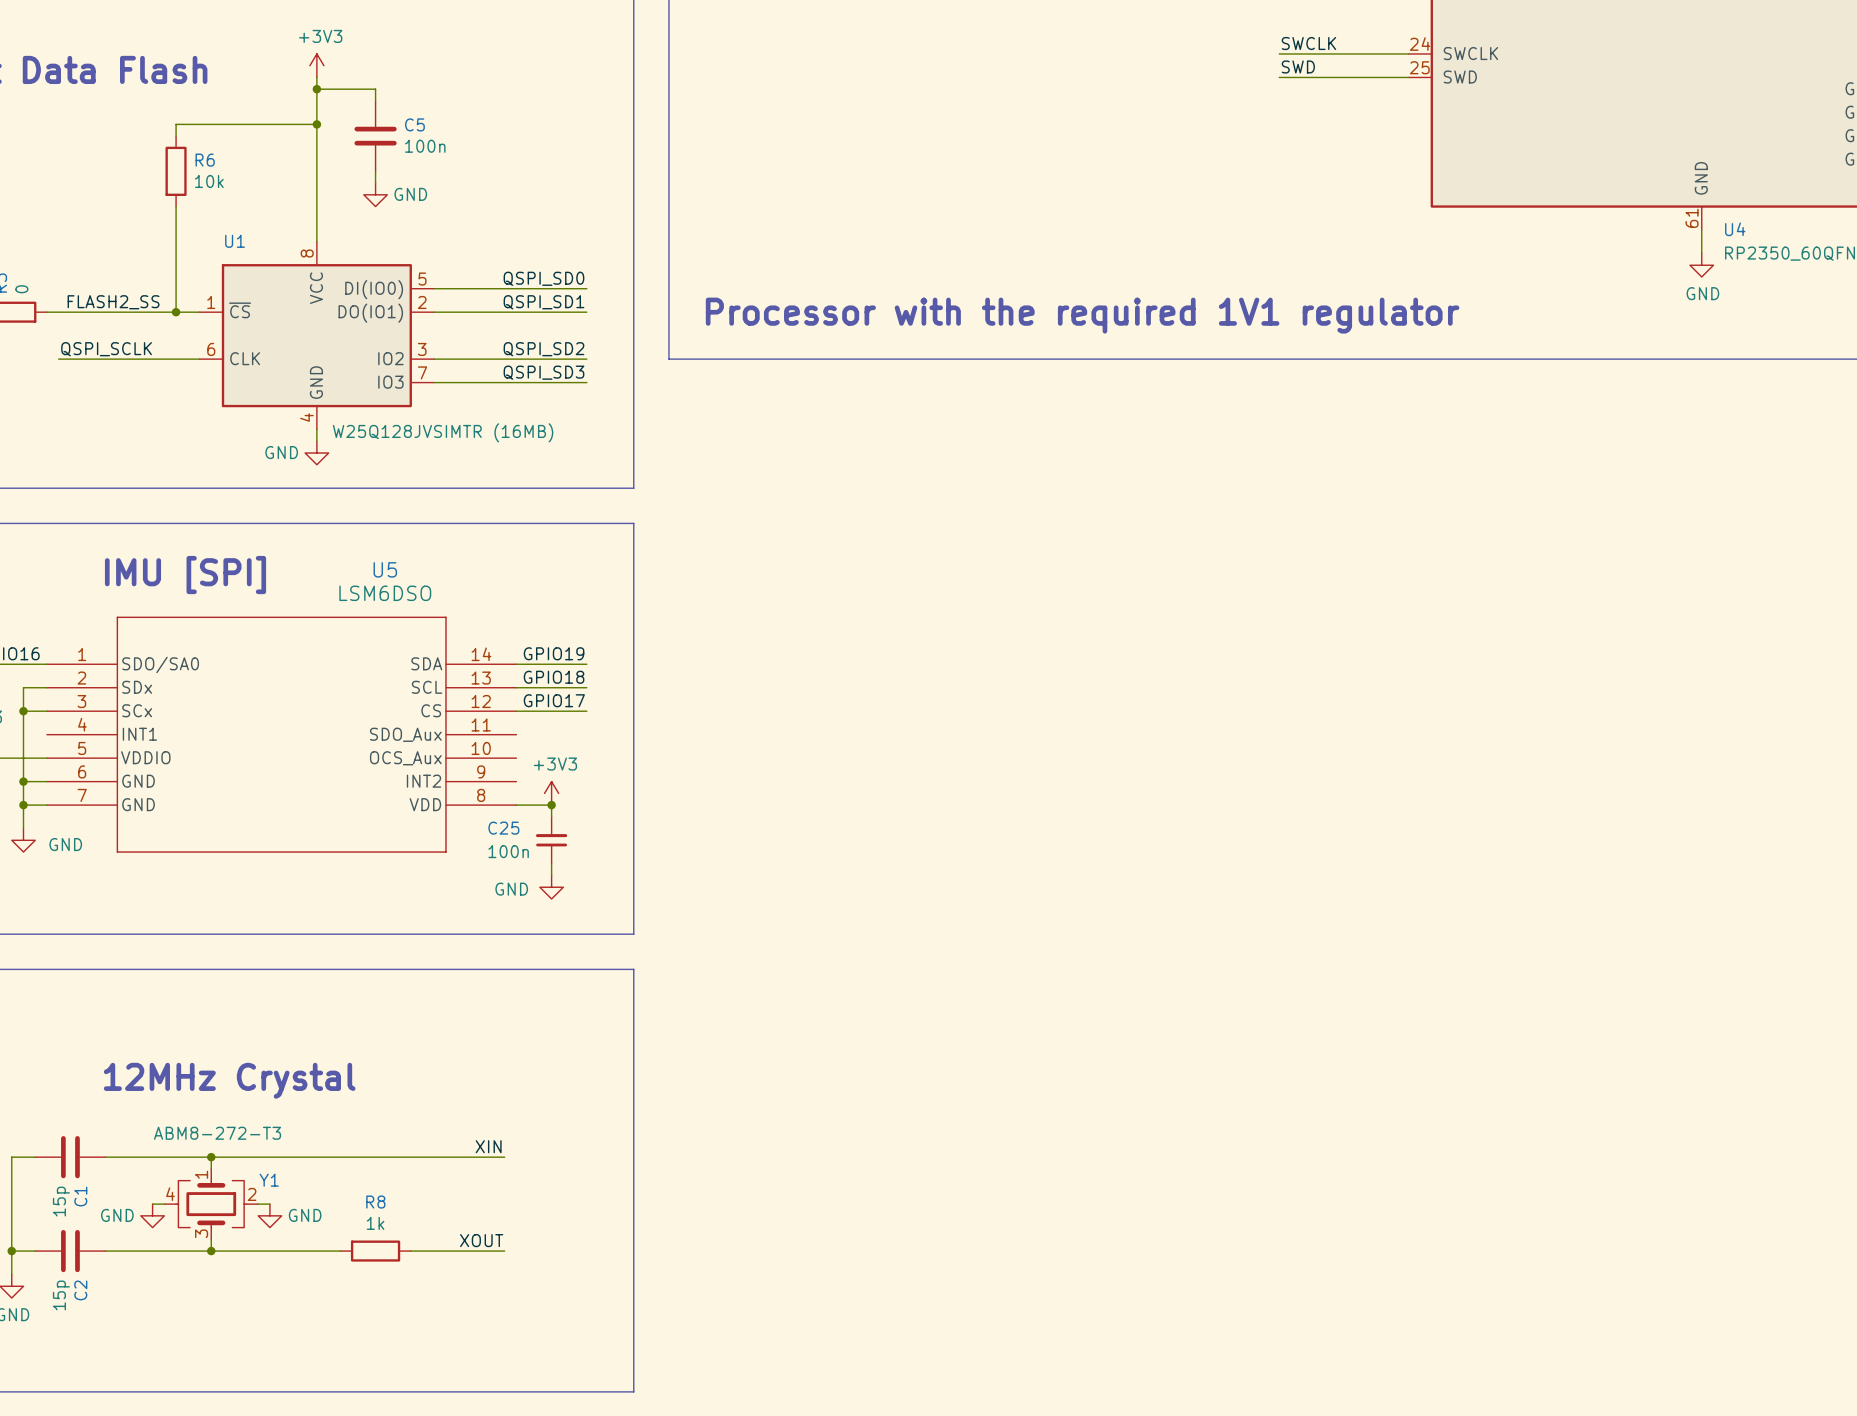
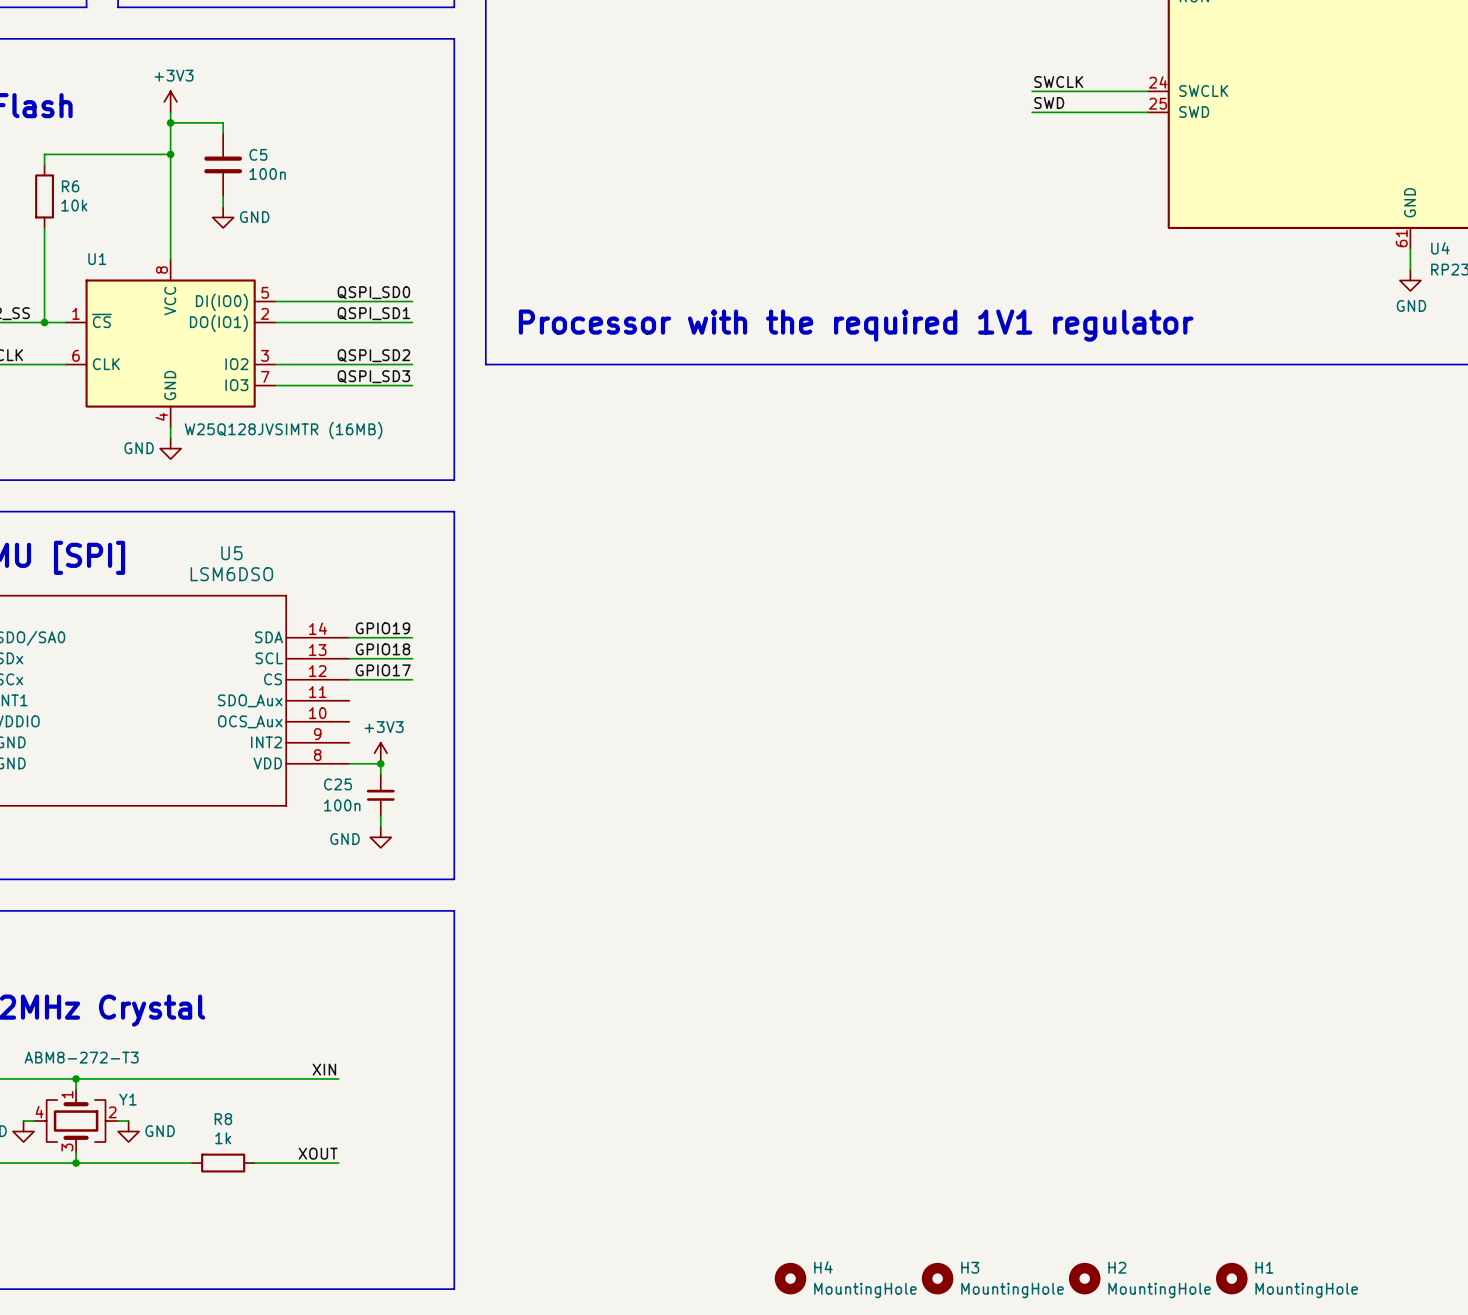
H4: none -> MountingHole (790, 1278)
H3: none -> MountingHole (937, 1278)
H2: none -> MountingHole (1084, 1278)
H1: none -> MountingHole (1231, 1278)

